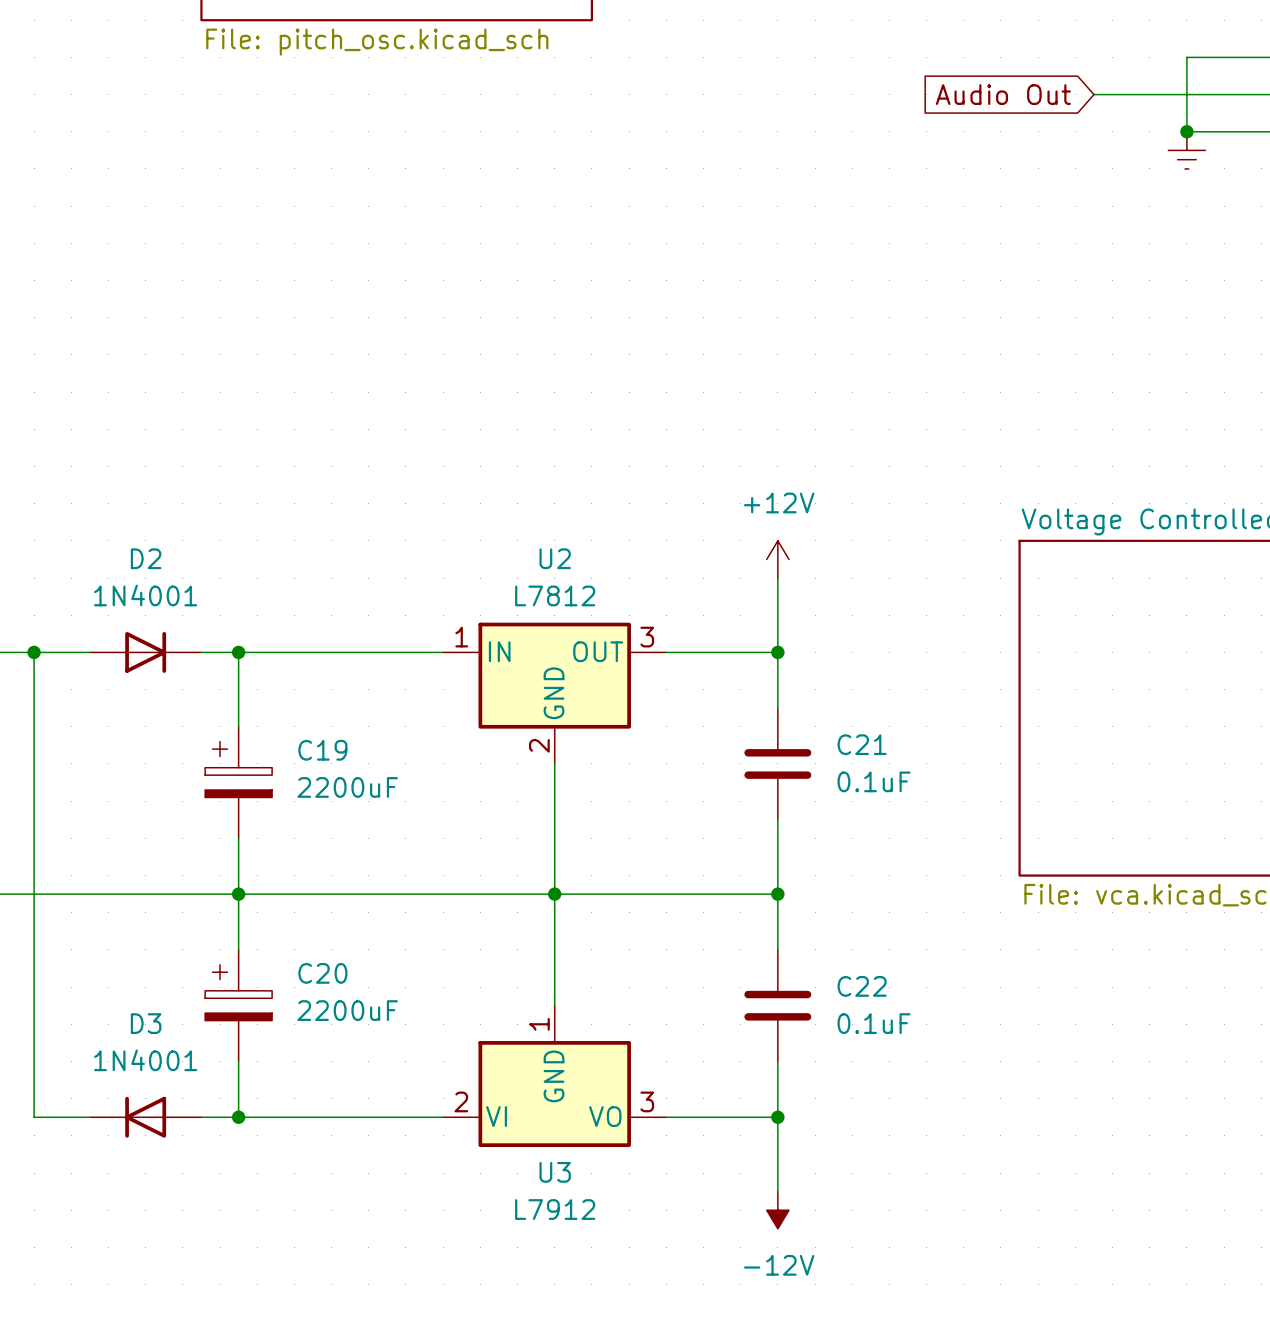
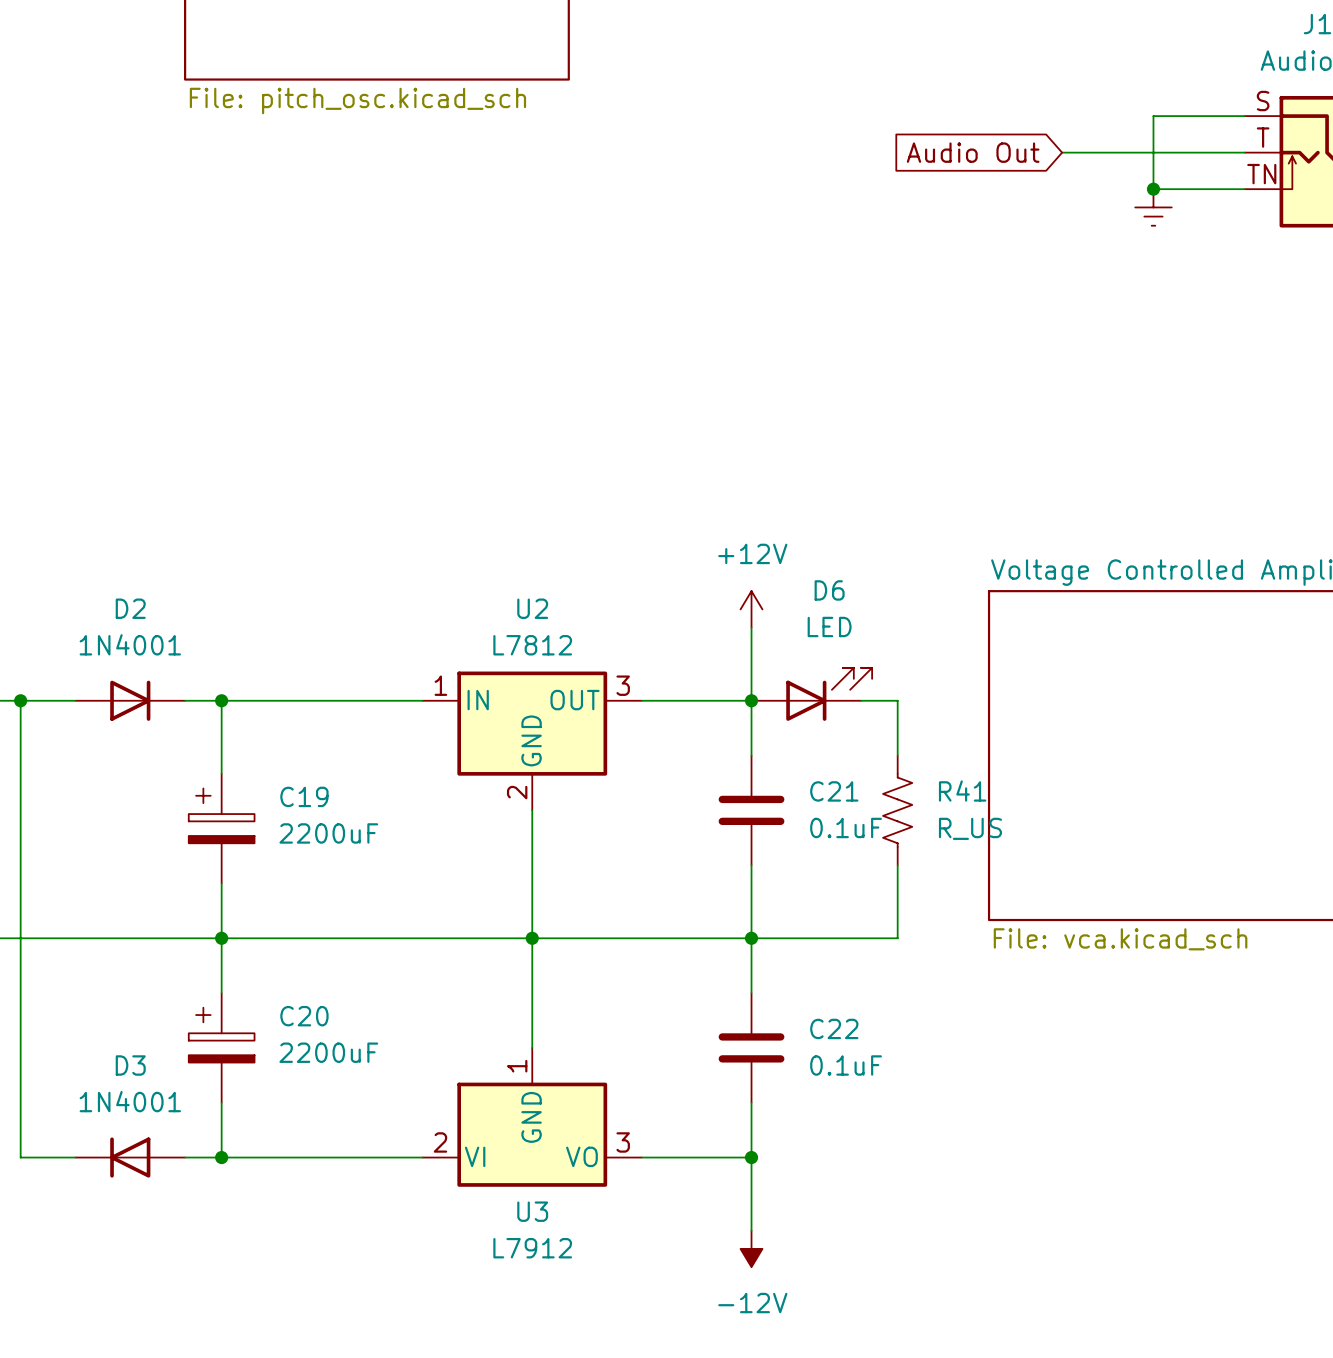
D6: none -> LED (811, 694)
wire: none -> (861, 700) (897, 700) (897, 755)
R41: none -> R_US (897, 810)
wire: none -> (897, 865) (897, 938) (751, 938)

